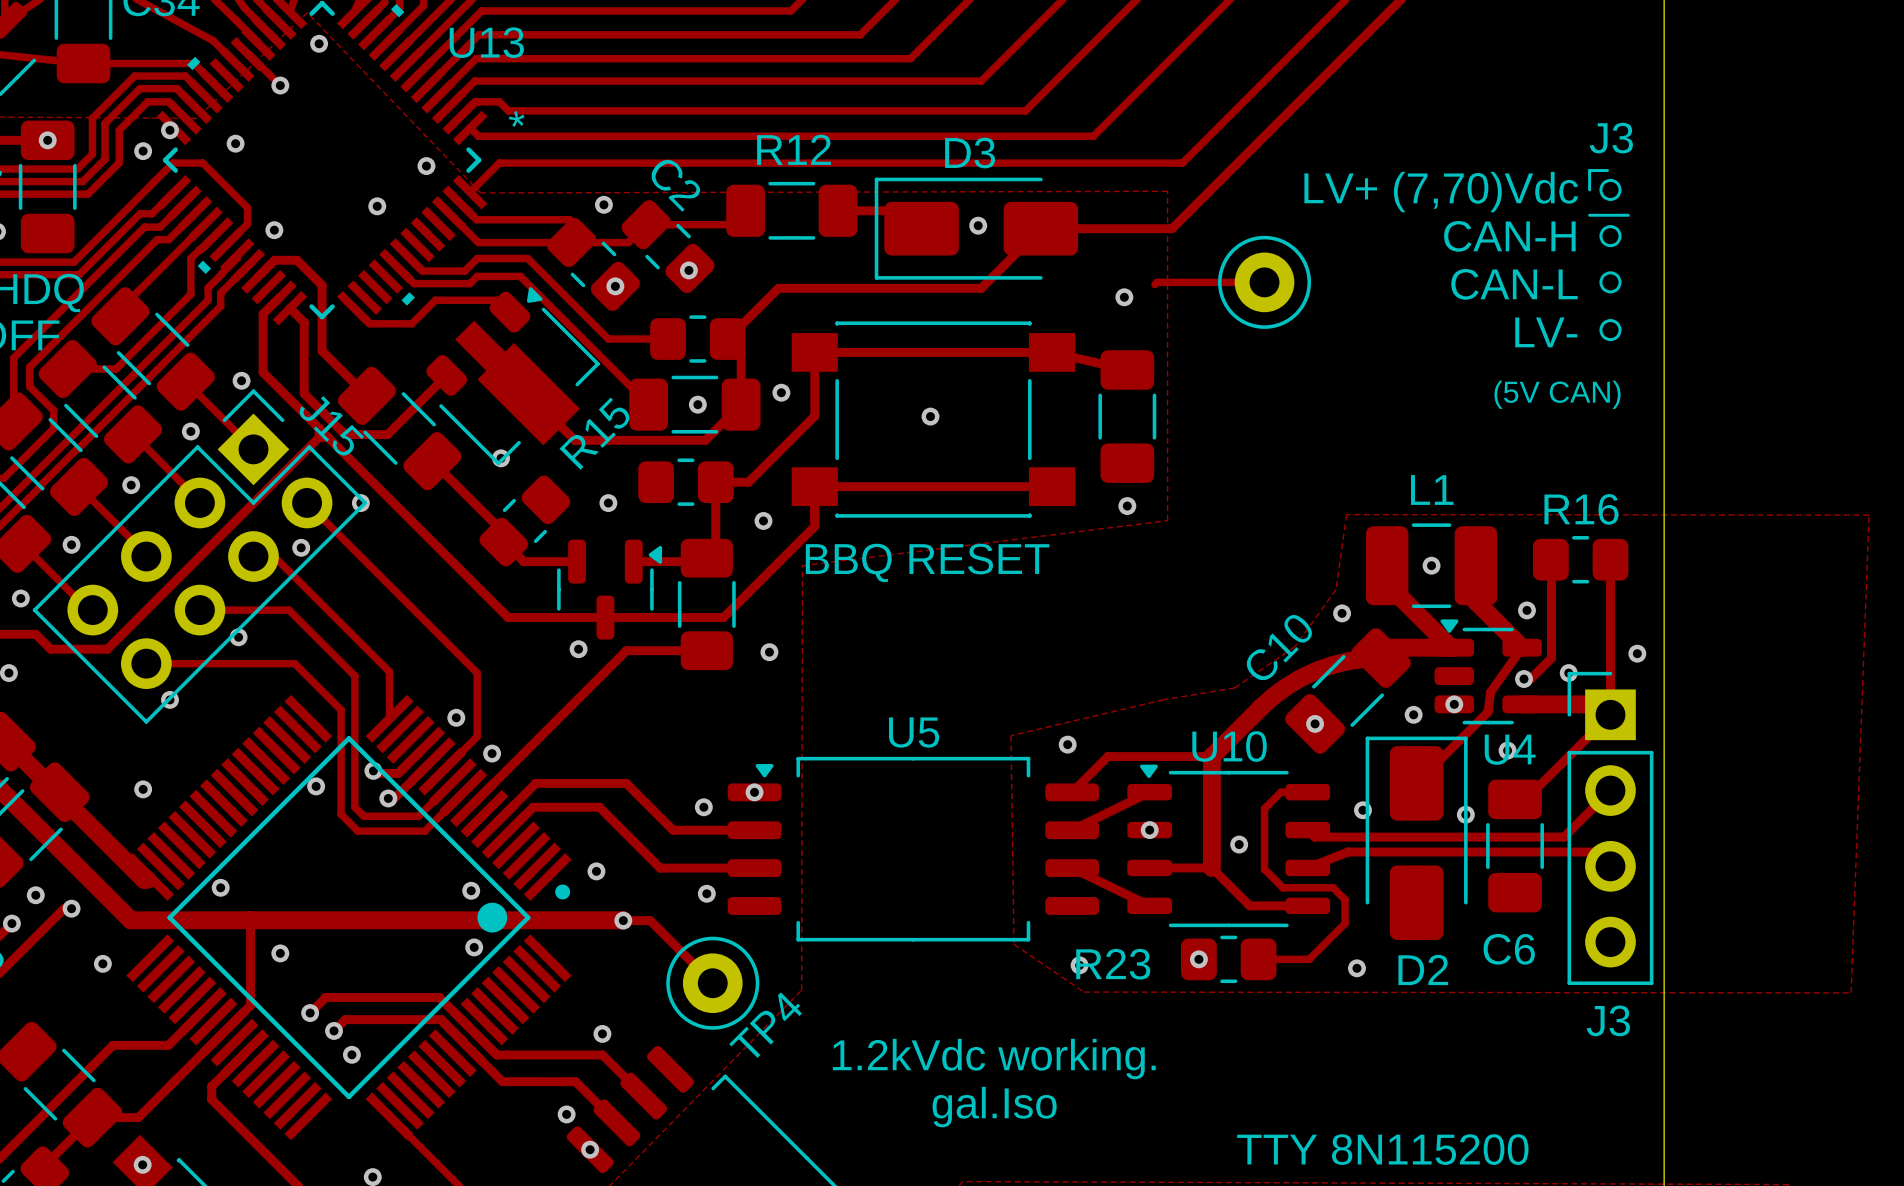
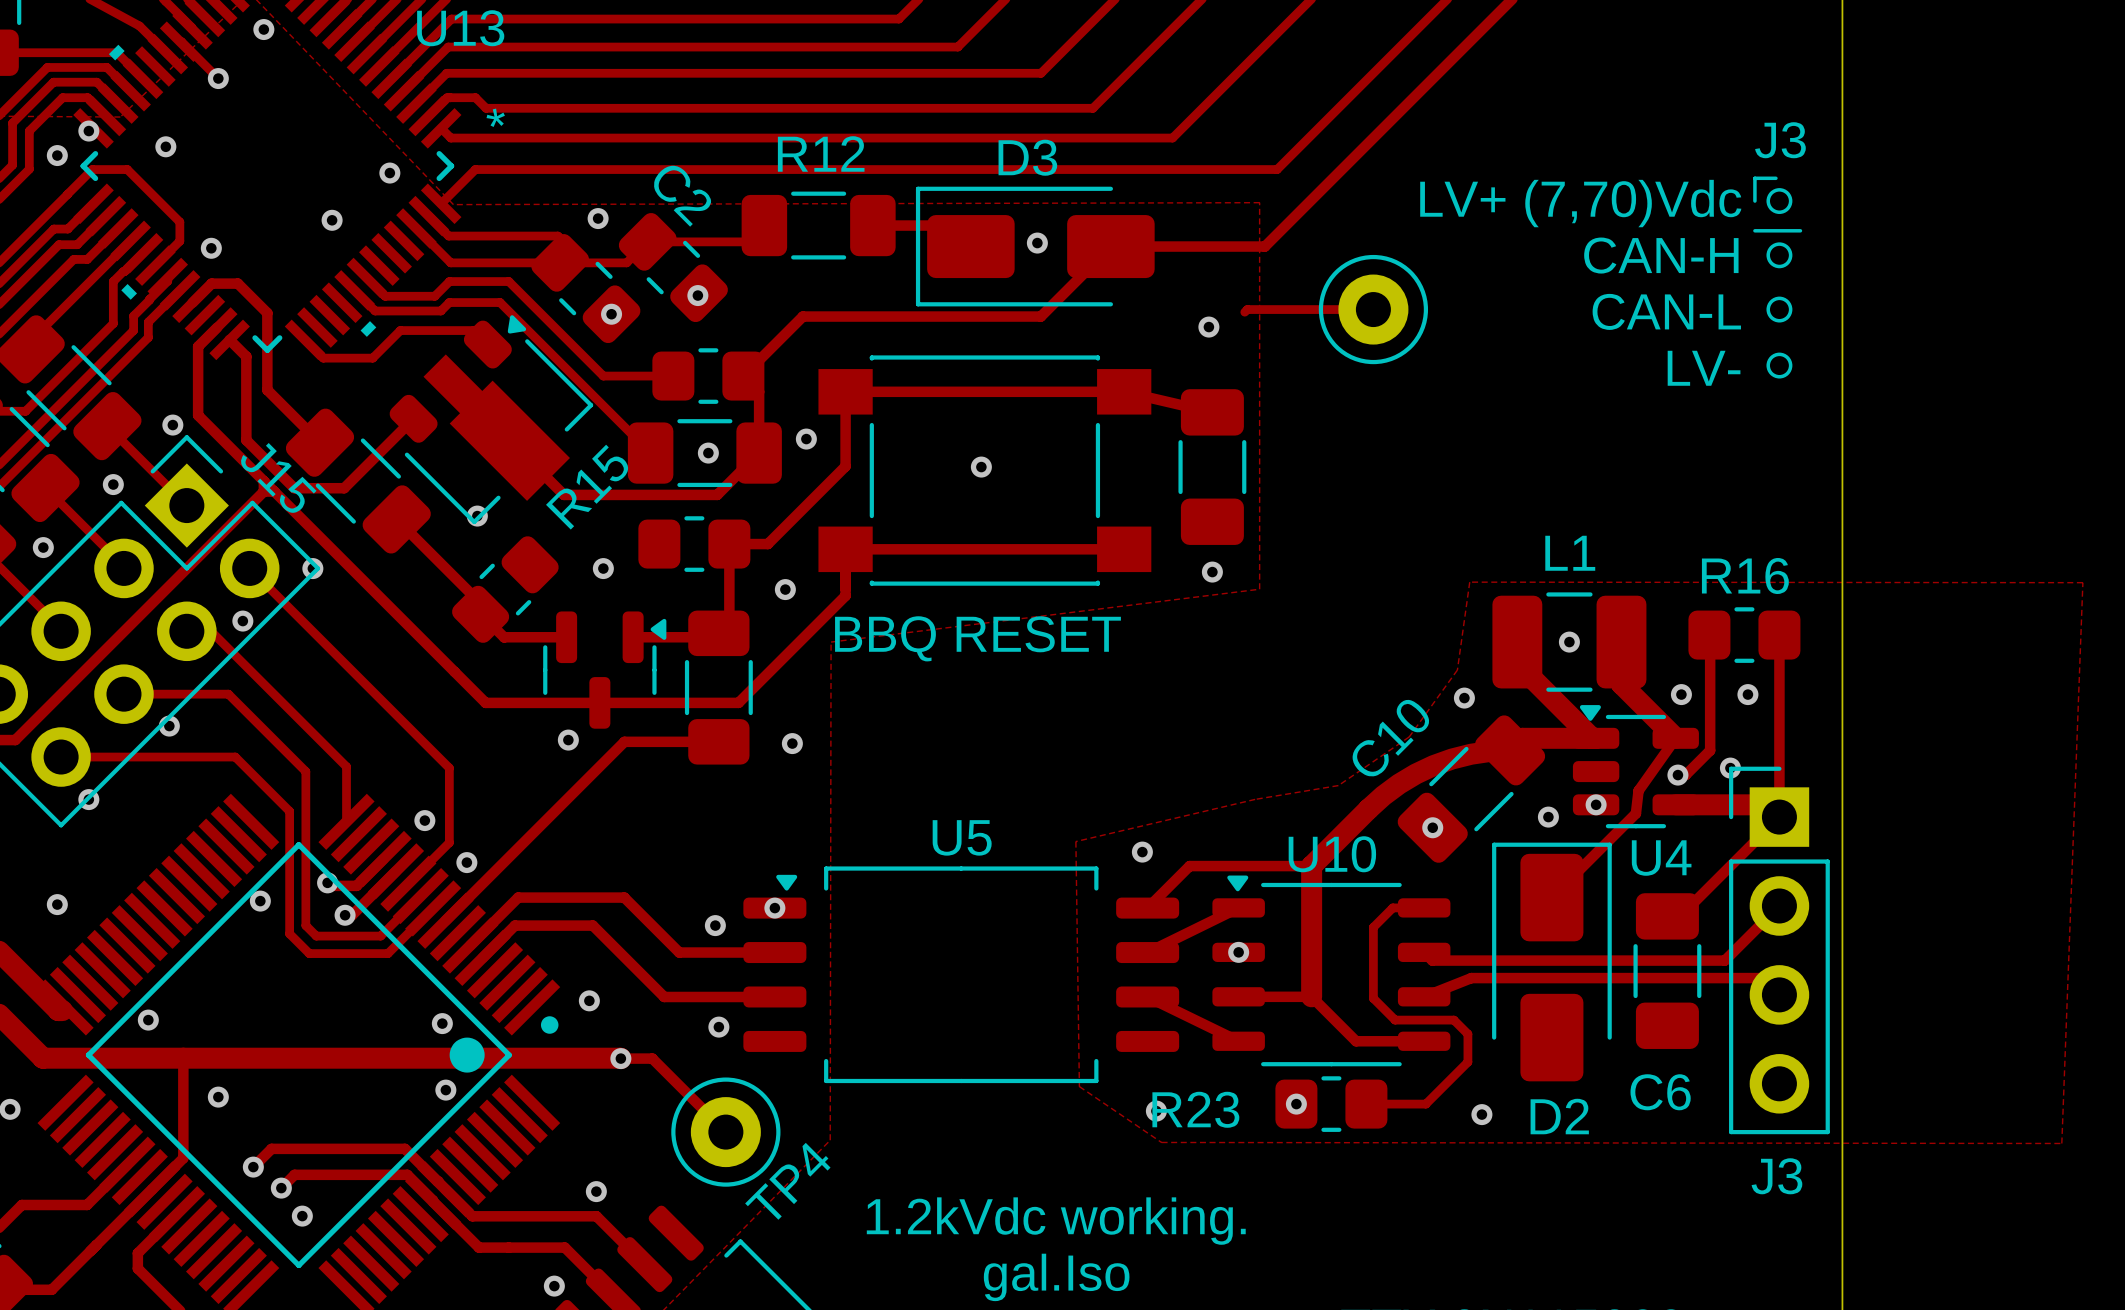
text: (5V CAN) (1557, 394) -> none
via position: (1637, 653) -> (1747, 694)
via: (1507, 750) -> none
via: (1362, 810) -> none
via: (1465, 814) -> none
via: (1239, 844) -> none

